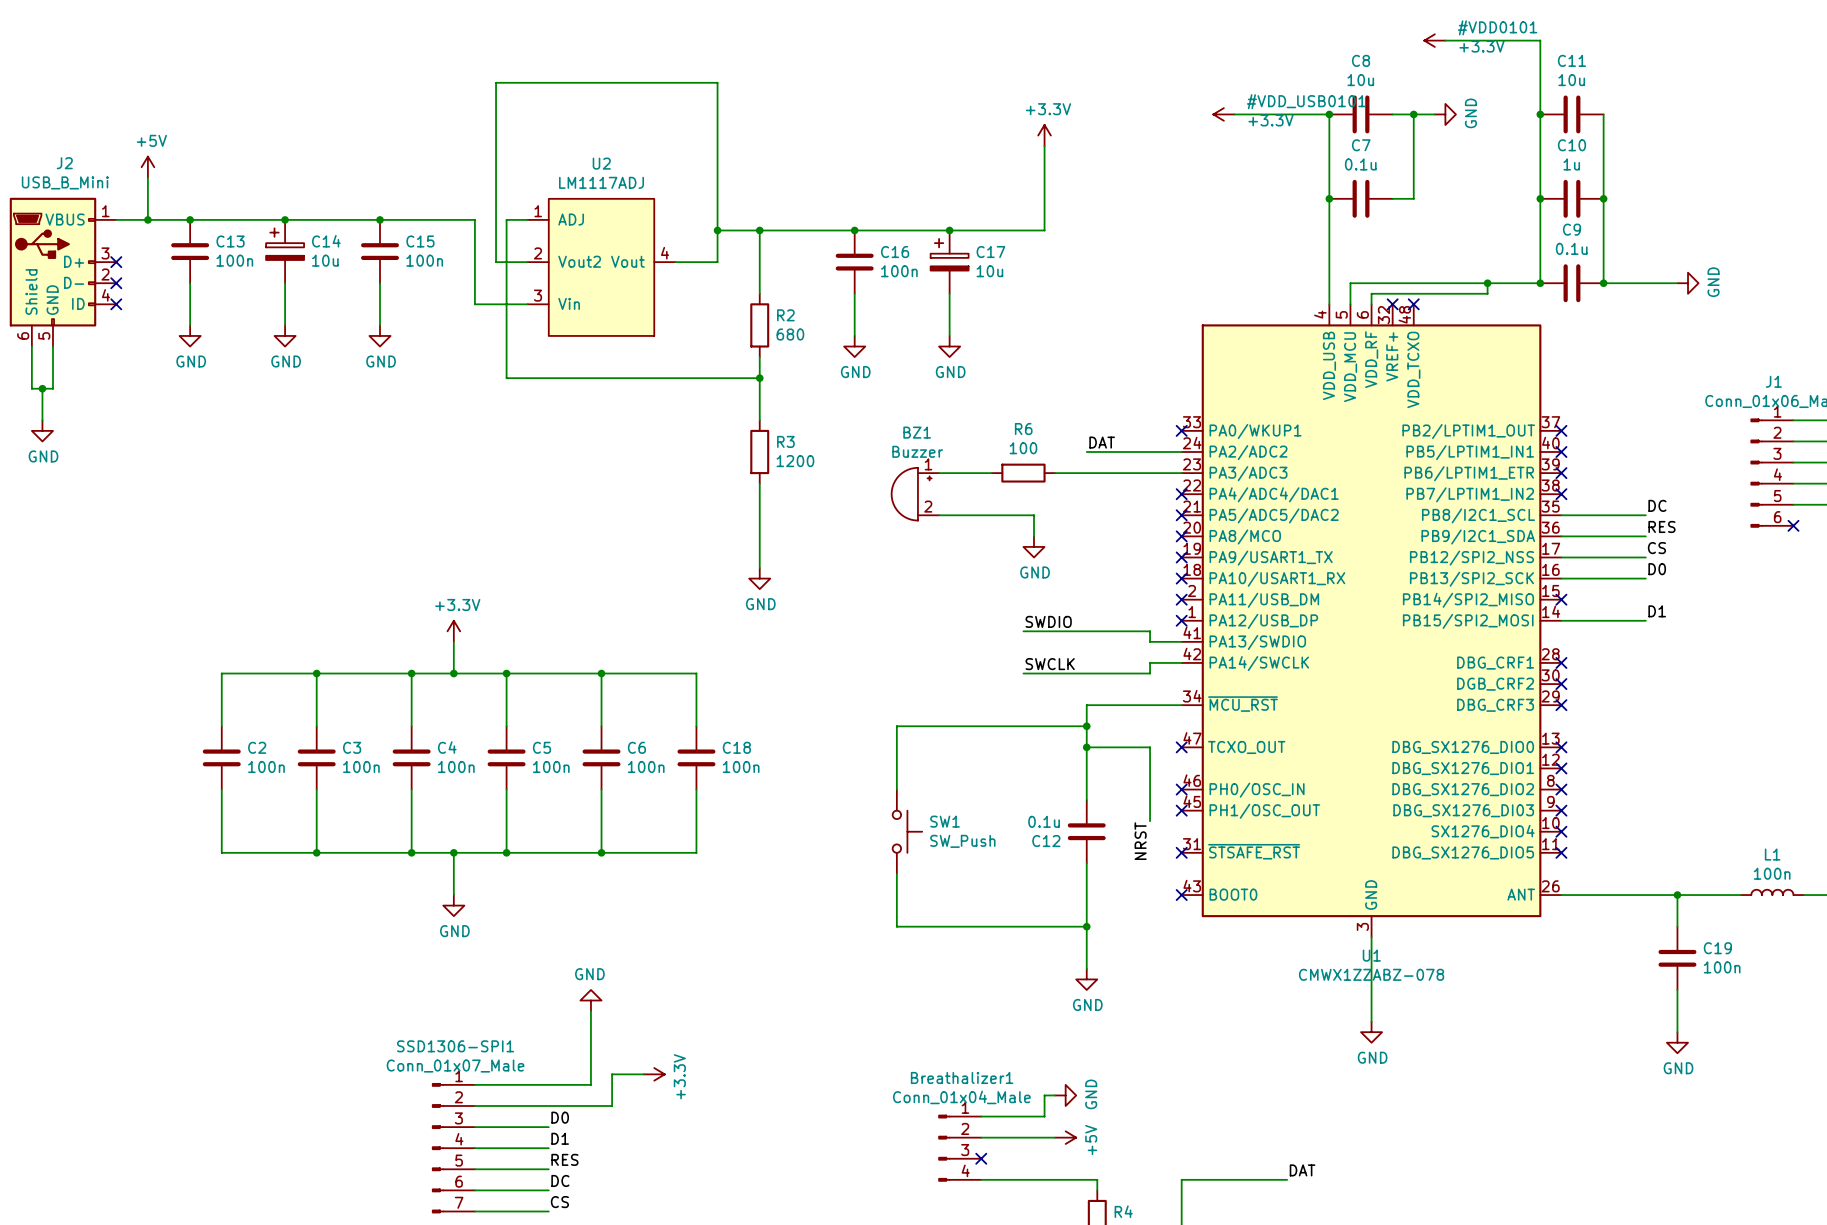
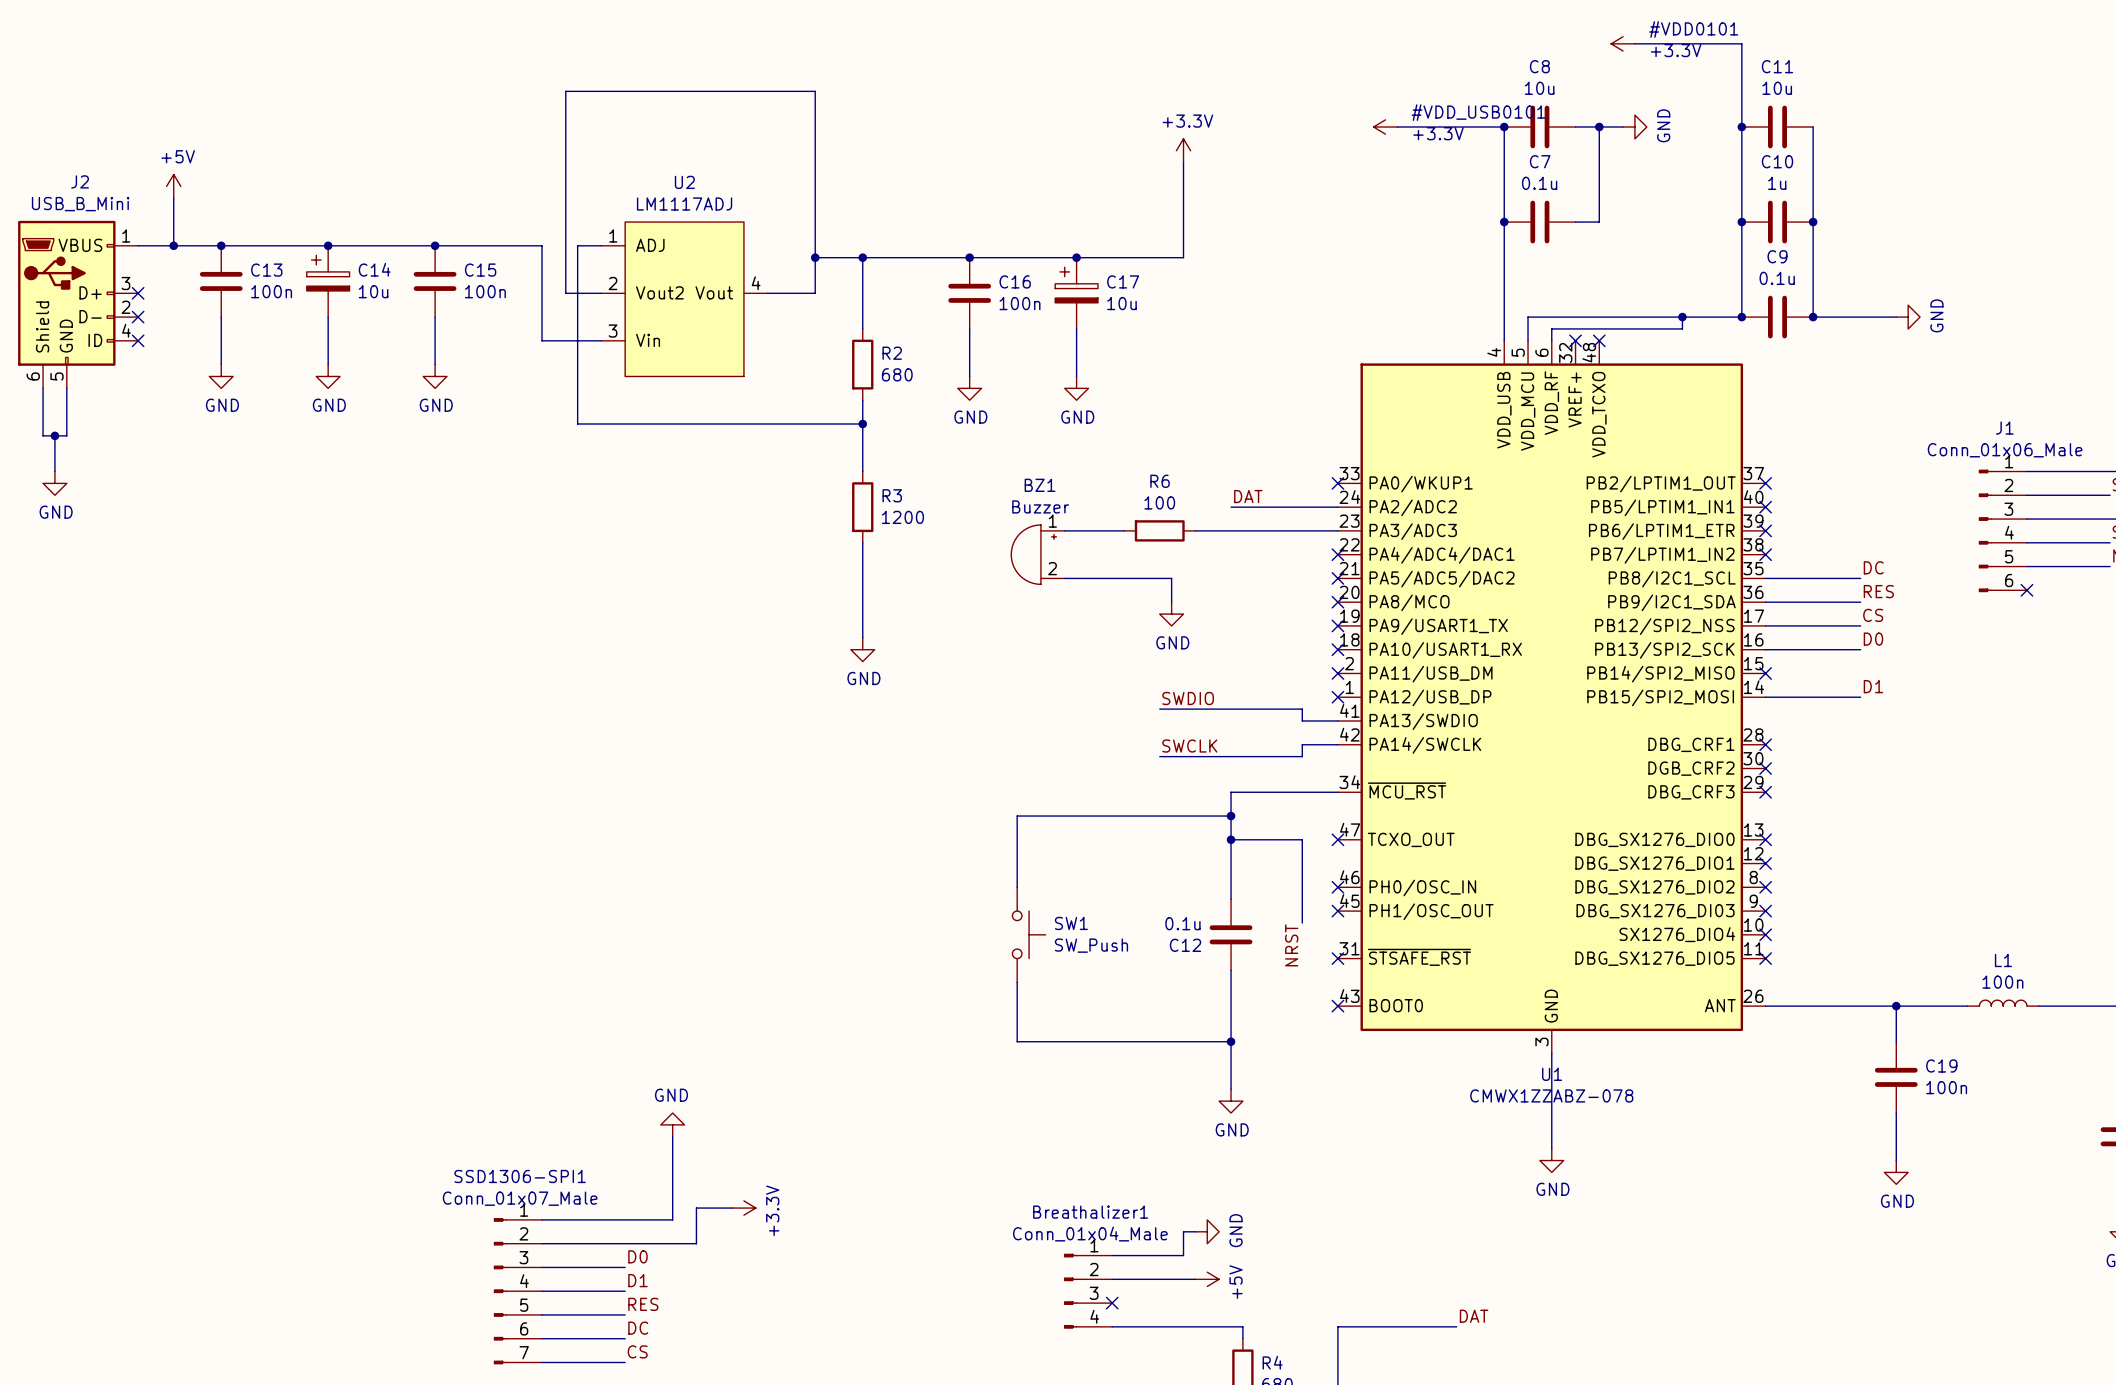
power symbol: +3.3V (453, 631) -> none
wire: (453, 641) (453, 673) -> none
wire: (316, 673) (316, 726) -> none
junction: (316, 673) -> none
wire: (411, 673) (411, 726) -> none
junction: (411, 673) -> none
junction: (453, 673) -> none
wire: (506, 673) (506, 726) -> none
junction: (506, 673) -> none
wire: (601, 673) (601, 726) -> none
junction: (601, 673) -> none
wire: (221, 726) (221, 673) (696, 673) (696, 726) -> none
C2: 100n (221, 757) -> none
C3: 100n (316, 757) -> none
C4: 100n (411, 757) -> none
C5: 100n (506, 757) -> none
C6: 100n (601, 757) -> none
C18: 100n (696, 757) -> none
wire: (221, 789) (221, 852) (696, 852) (696, 789) -> none
wire: (316, 789) (316, 852) -> none
wire: (411, 789) (411, 852) -> none
wire: (506, 789) (506, 852) -> none
wire: (601, 789) (601, 852) -> none
junction: (316, 852) -> none
junction: (411, 852) -> none
wire: (453, 852) (453, 895) -> none
junction: (453, 852) -> none
junction: (506, 852) -> none
junction: (601, 852) -> none
power symbol: GND (453, 905) -> none

